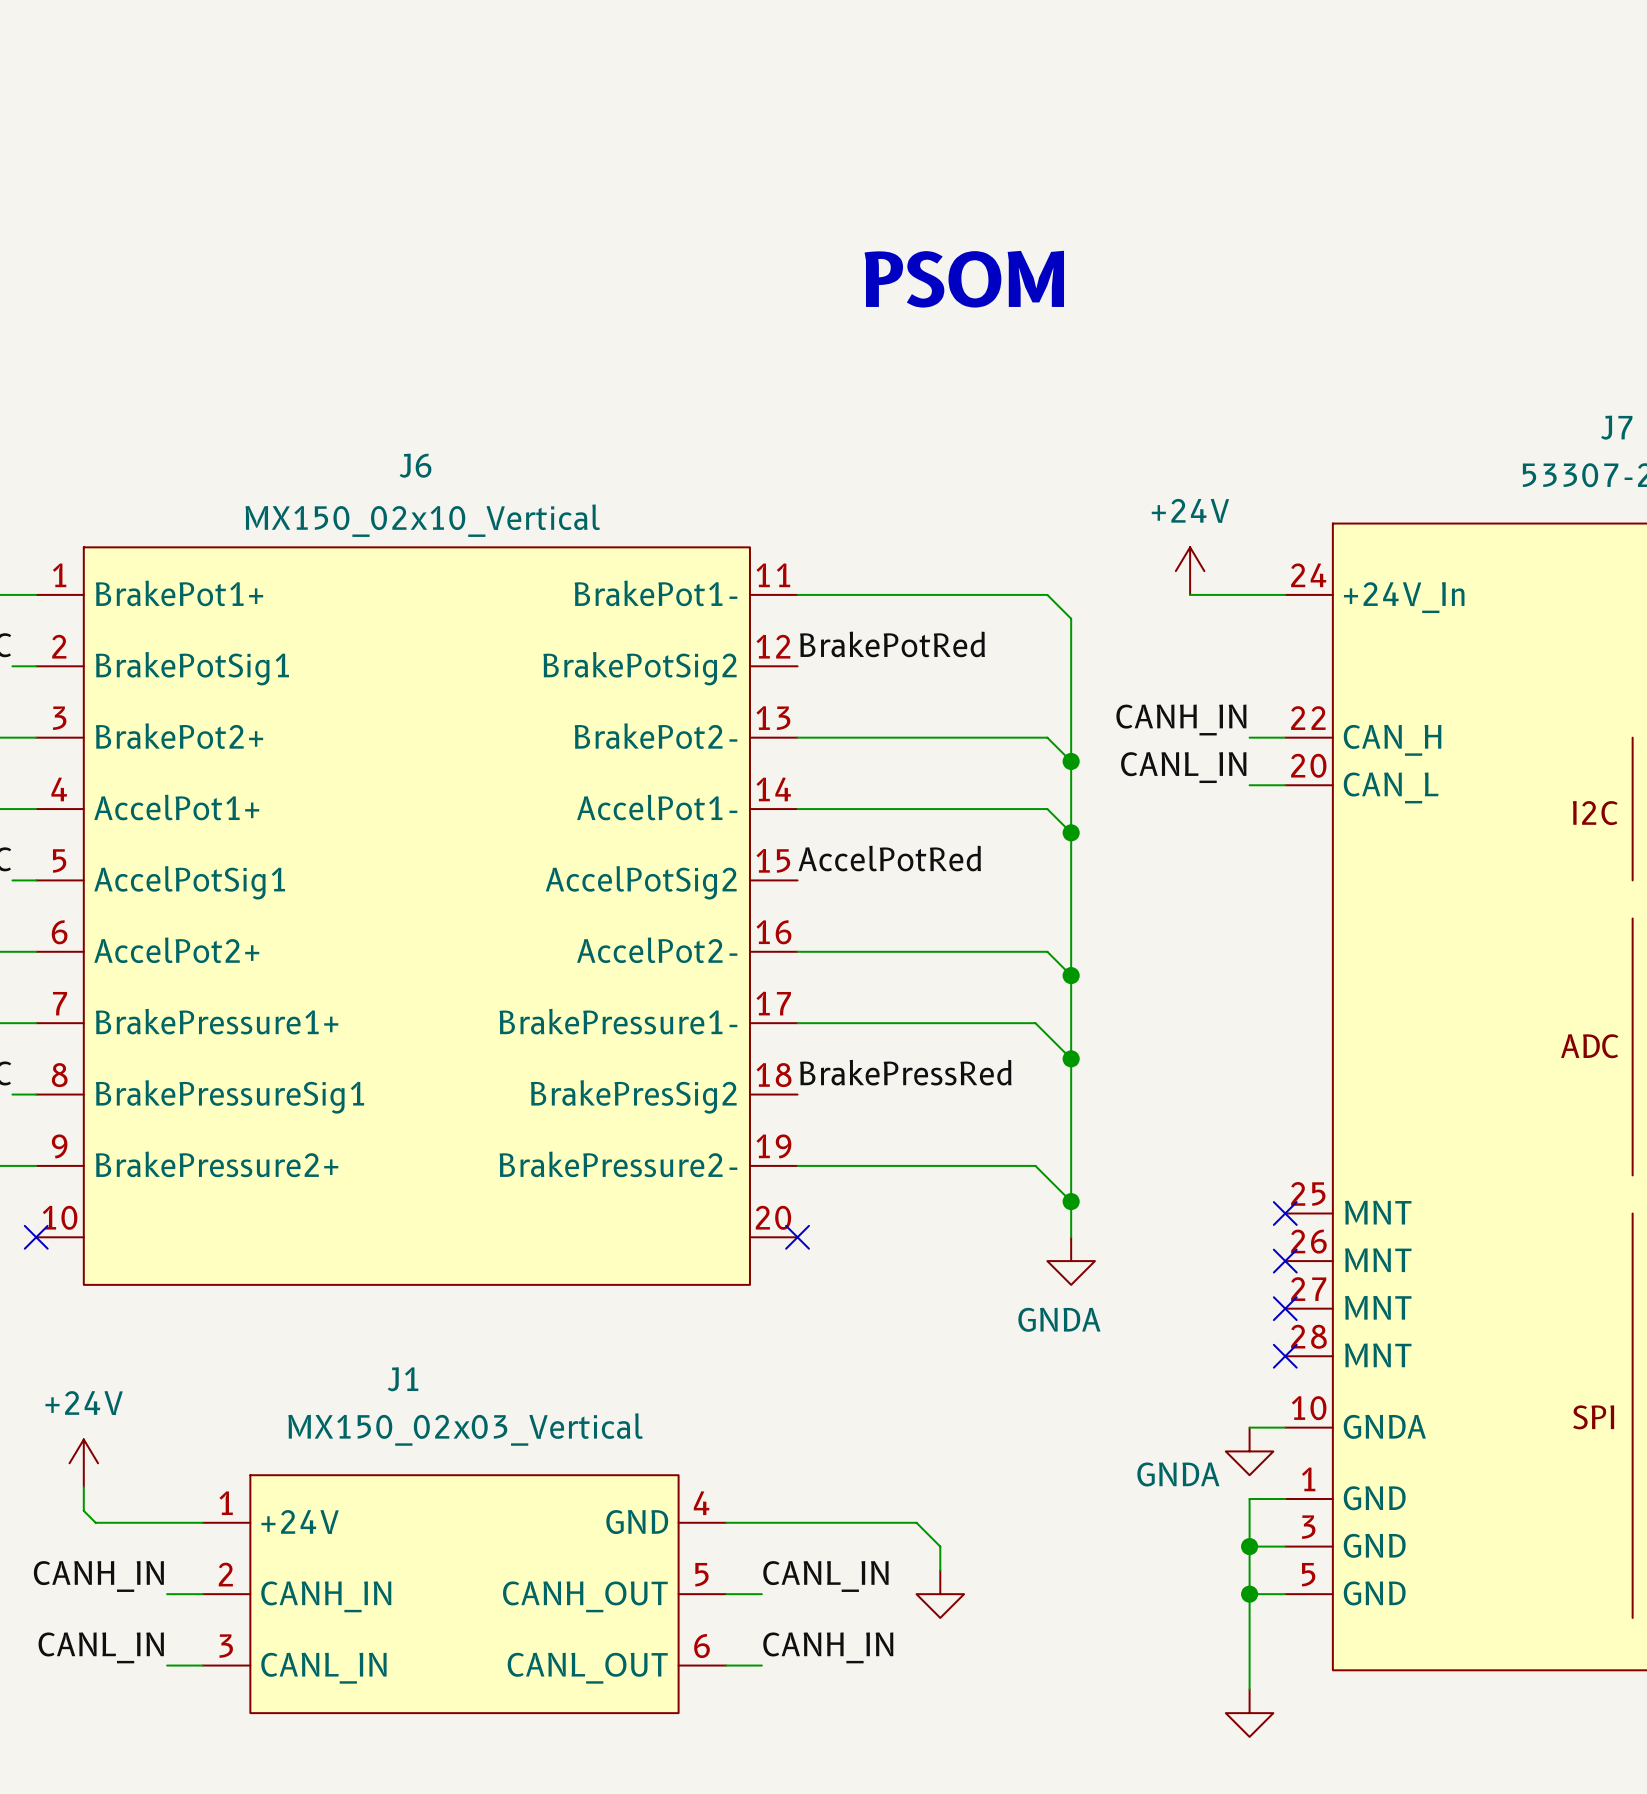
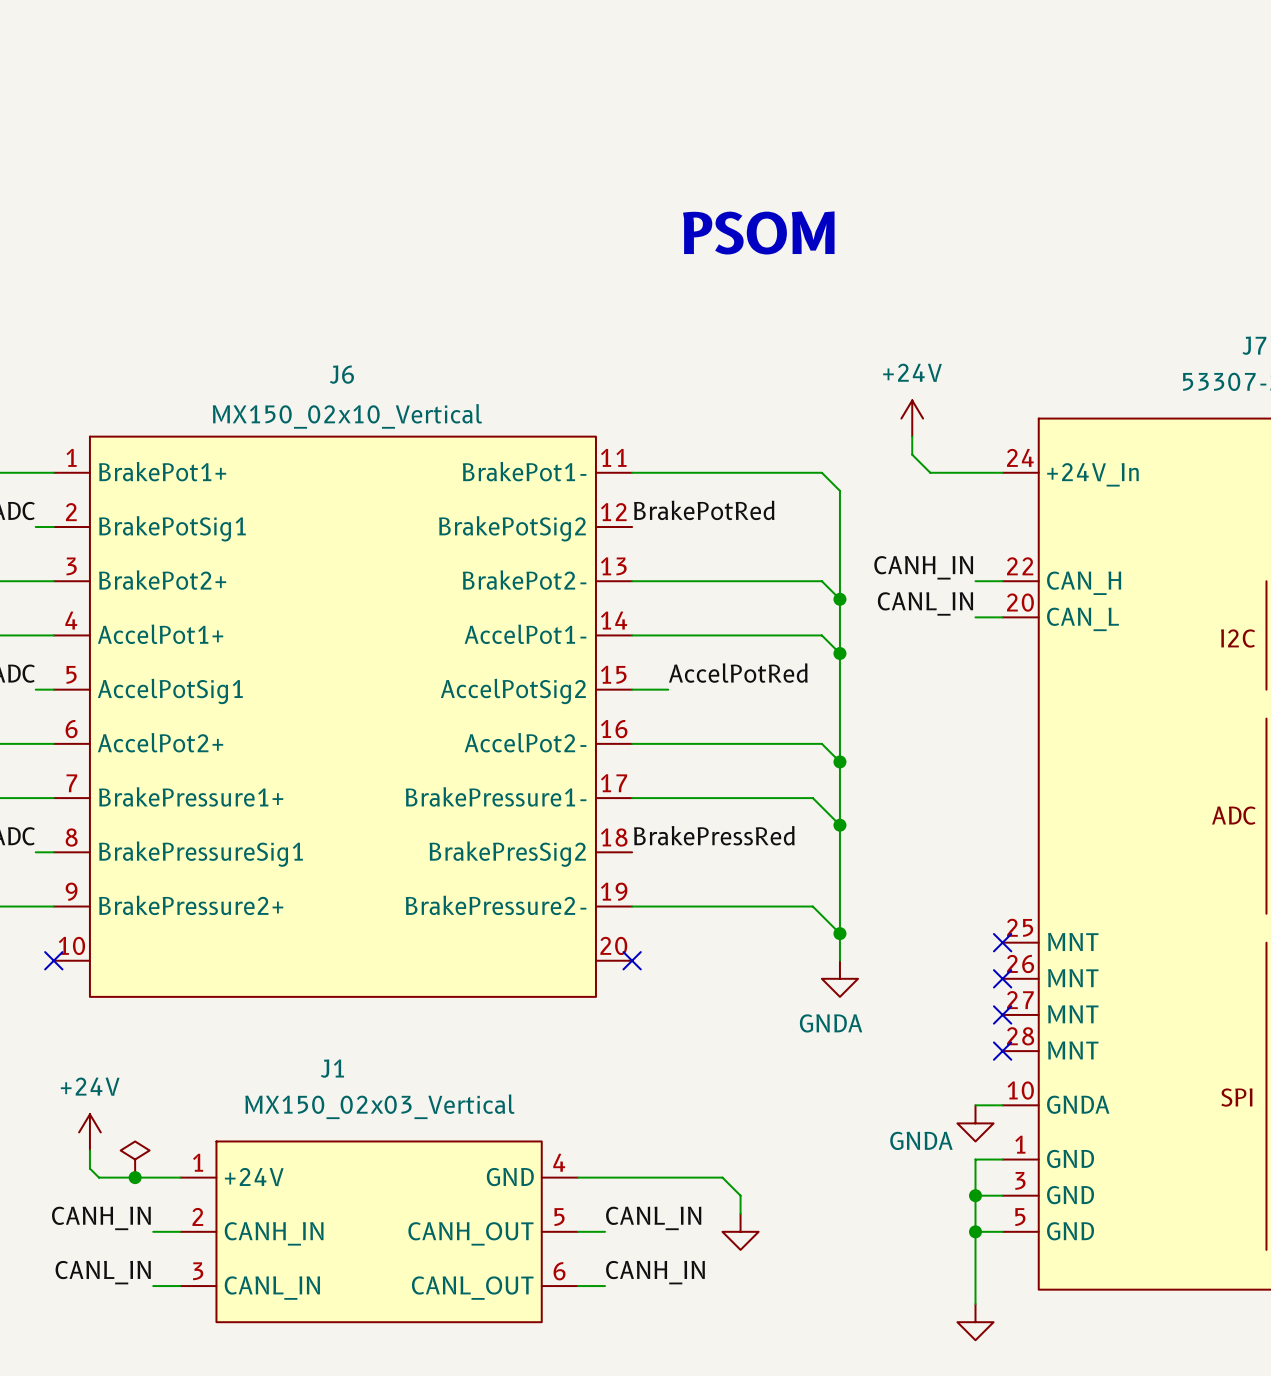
wire: none -> (912, 436) (912, 454) (930, 472)
power symbol position: +24V (1190, 571) -> +24V (912, 418)
label position: AccelPotRed (889, 858) -> AccelPotRed (738, 673)
wire: none -> (632, 689) (668, 689)
power symbol: none -> (135, 1159)
junction: none -> (135, 1177)

